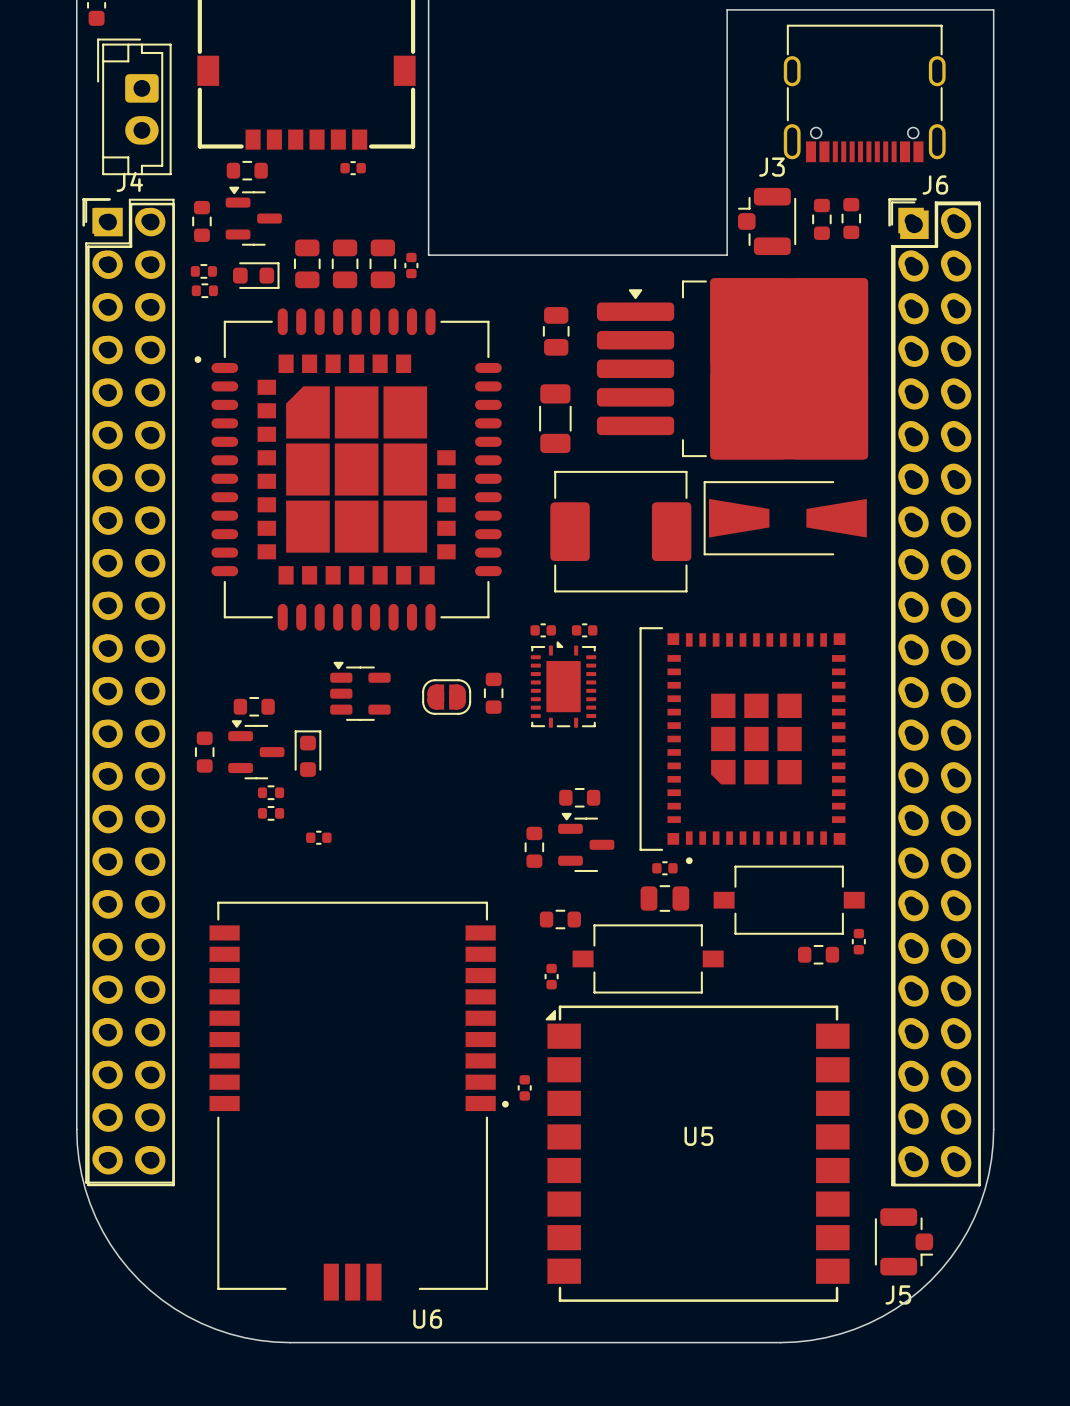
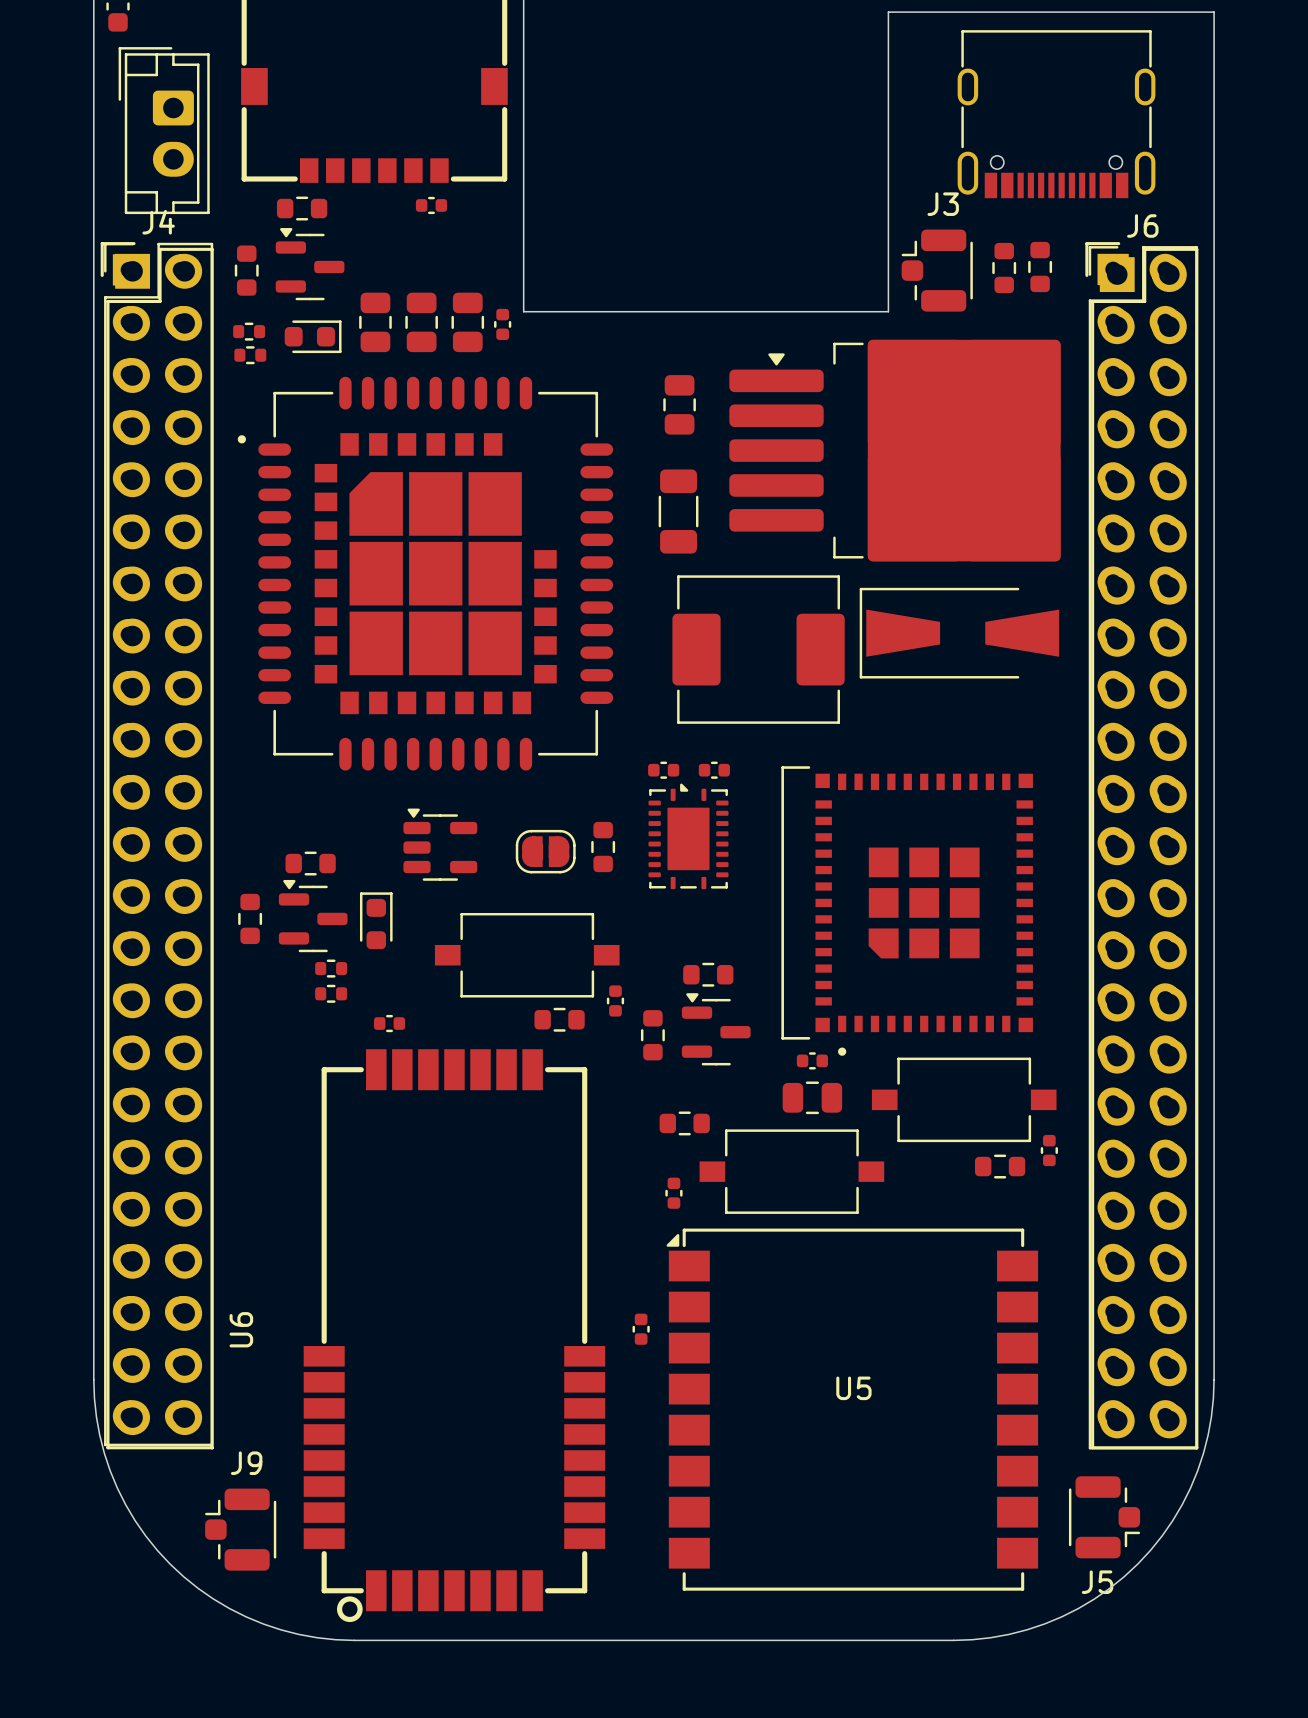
part: none -> (527, 955)
part: none -> (615, 1000)
part: none -> (559, 1019)
U6 footprint: [209, 901, 509, 1301] -> [303, 1049, 606, 1623]
J9: none -> (240, 1529)
U6 name position: U6 (427, 1319) -> U6 (241, 1329)

